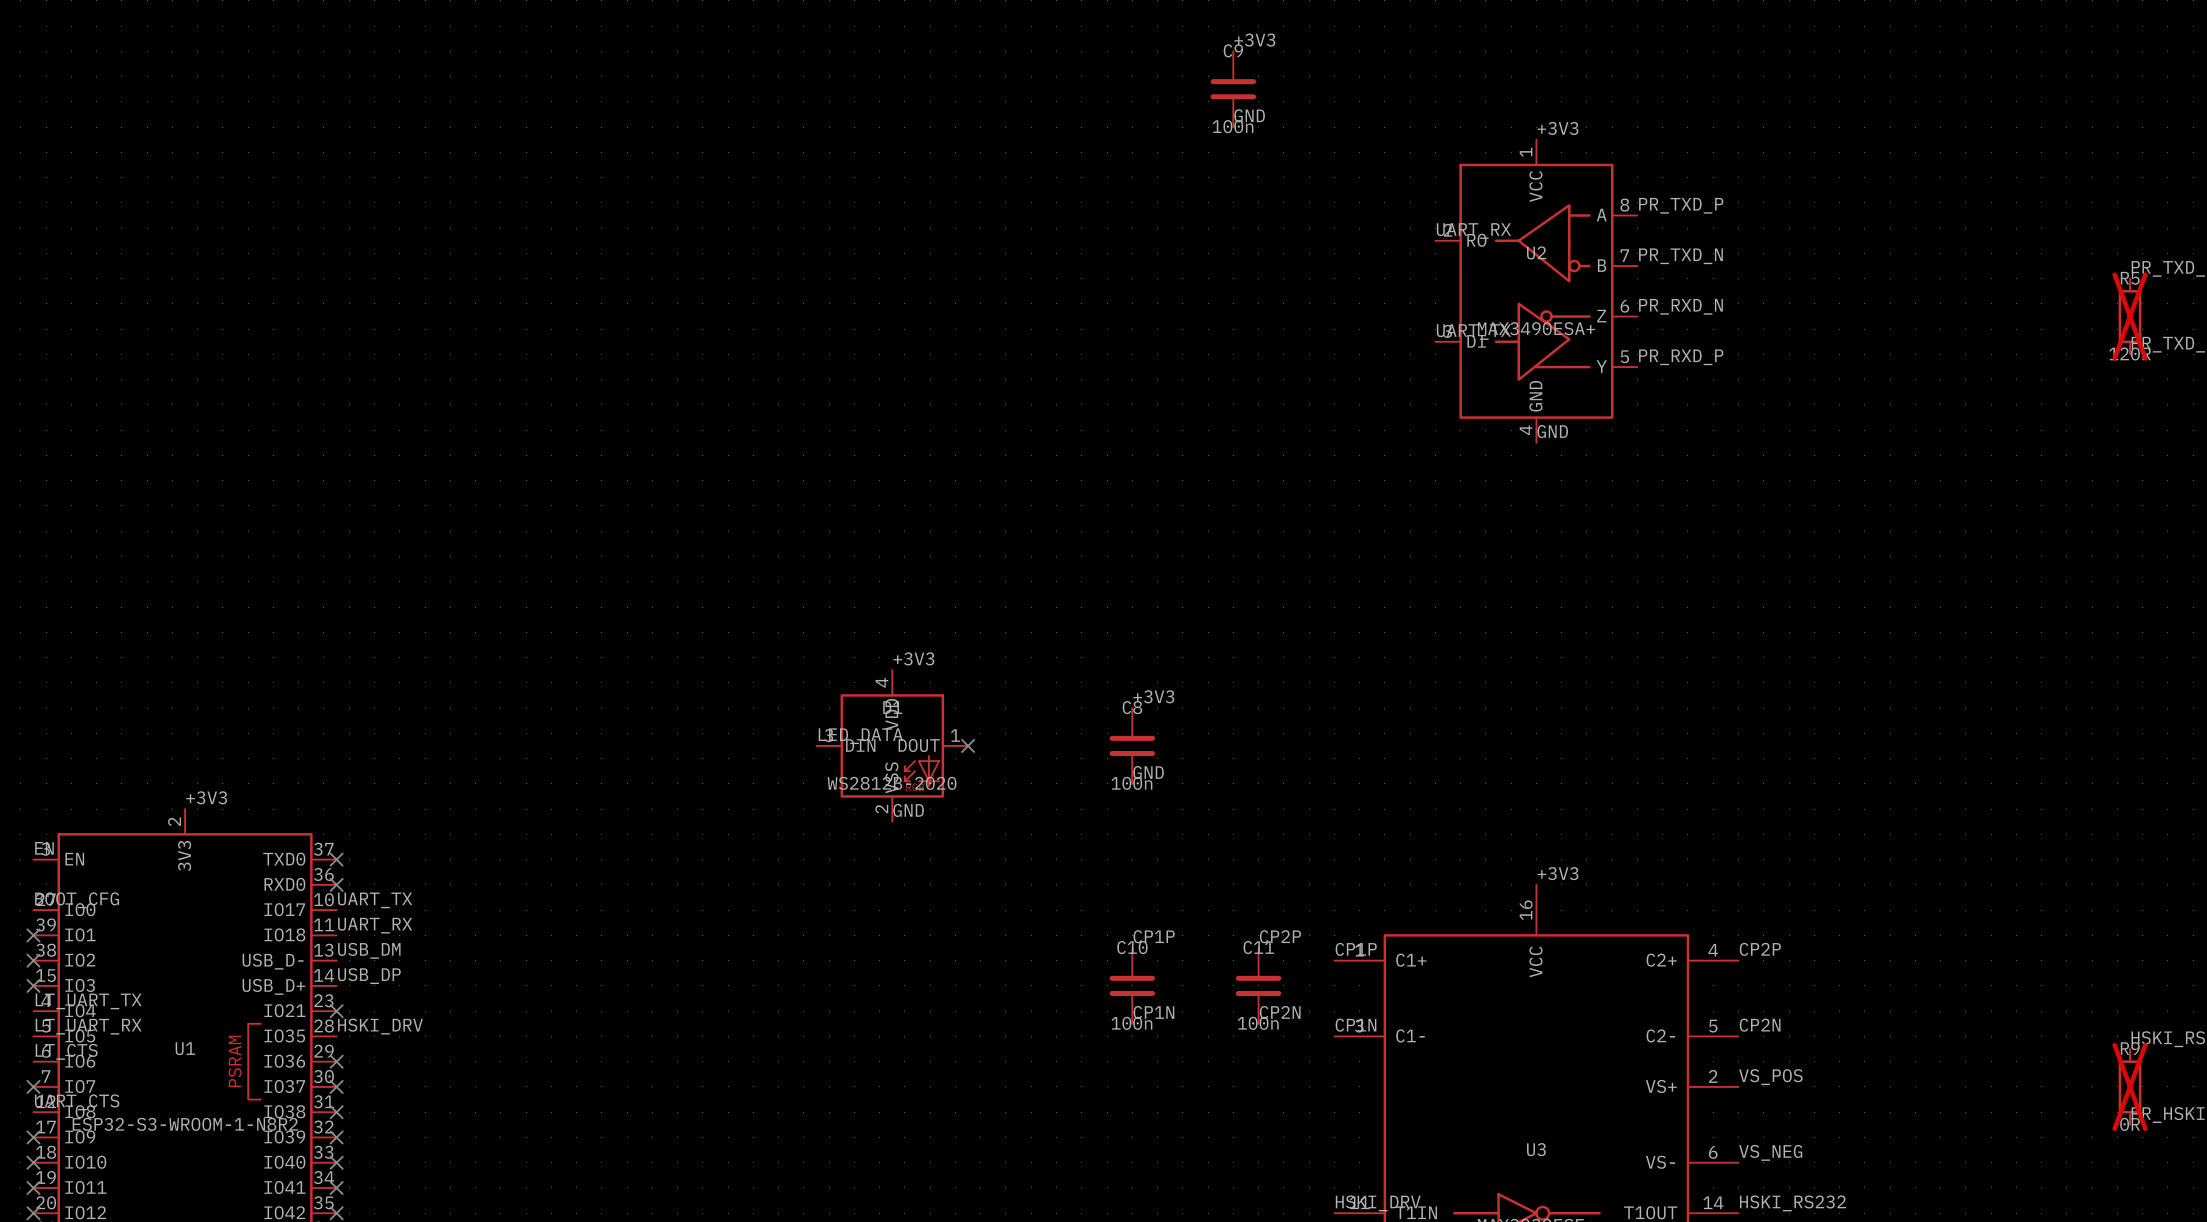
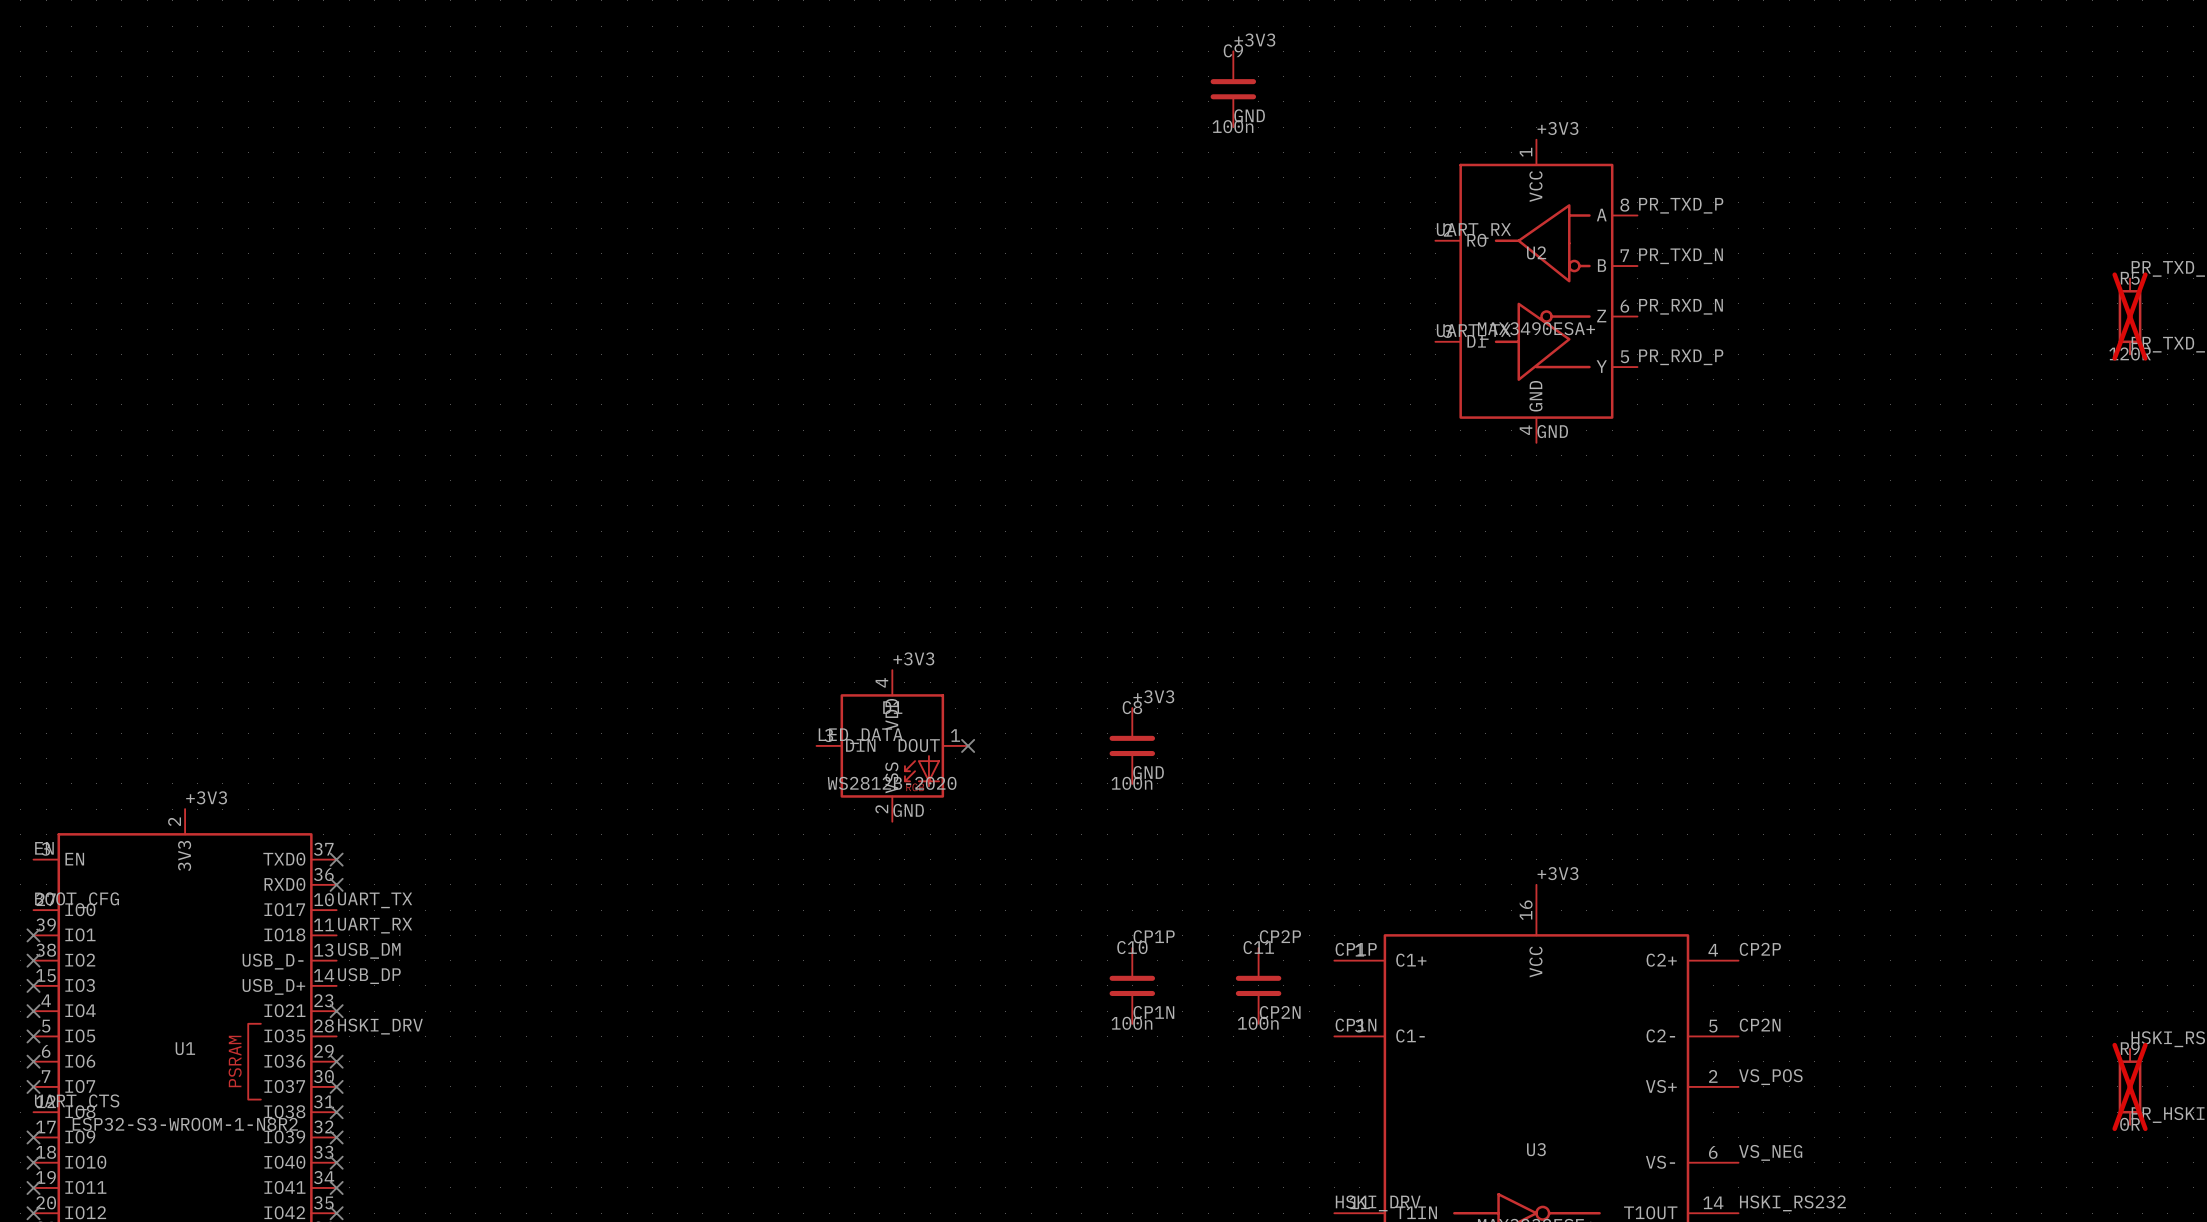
label: LT_UART_TX (88, 1001) -> none
no-connect mark: none -> (33, 1011)
label: LT_UART_RX (88, 1026) -> none
no-connect mark: none -> (33, 1036)
label: LT_CTS (66, 1051) -> none
no-connect mark: none -> (33, 1061)

